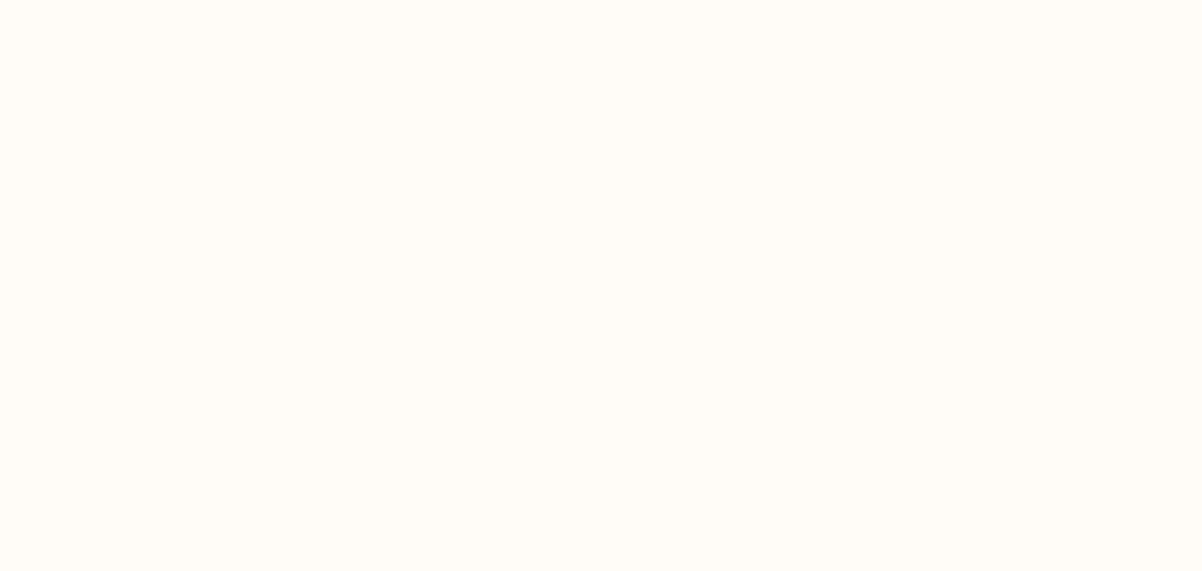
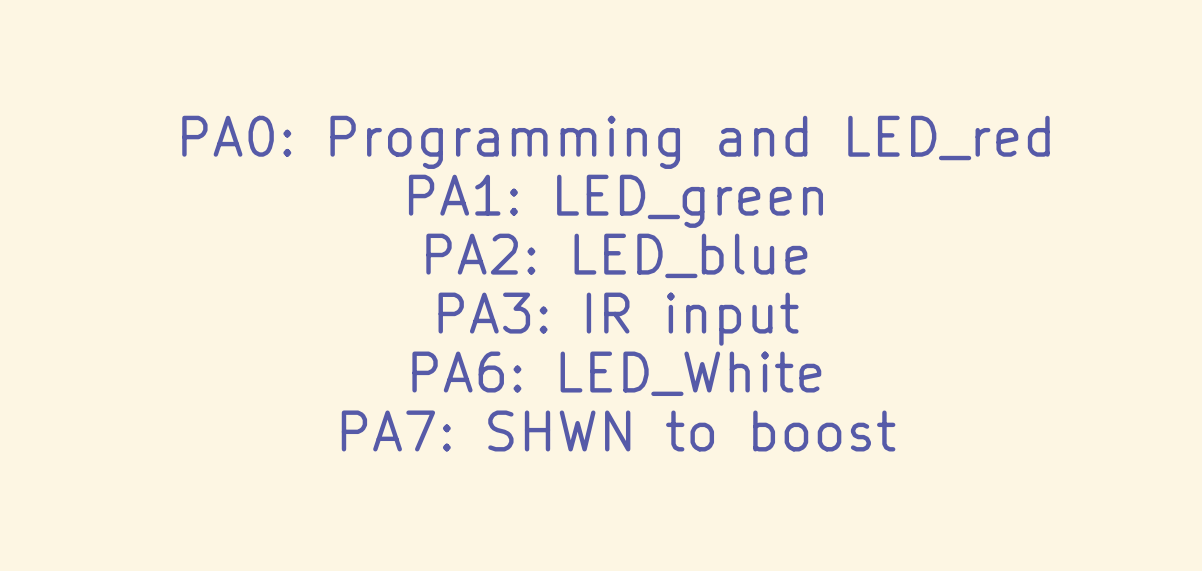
text: none -> PA0: Programming and LED_red (615, 142)
text: none -> PA1: LED_green (615, 201)
text: none -> PA2: LED_blue (616, 255)
text: none -> PA3: IR input (618, 319)
text: none -> PA6: LED_White (616, 373)
text: none -> PA7: SHWN to boost (618, 430)

